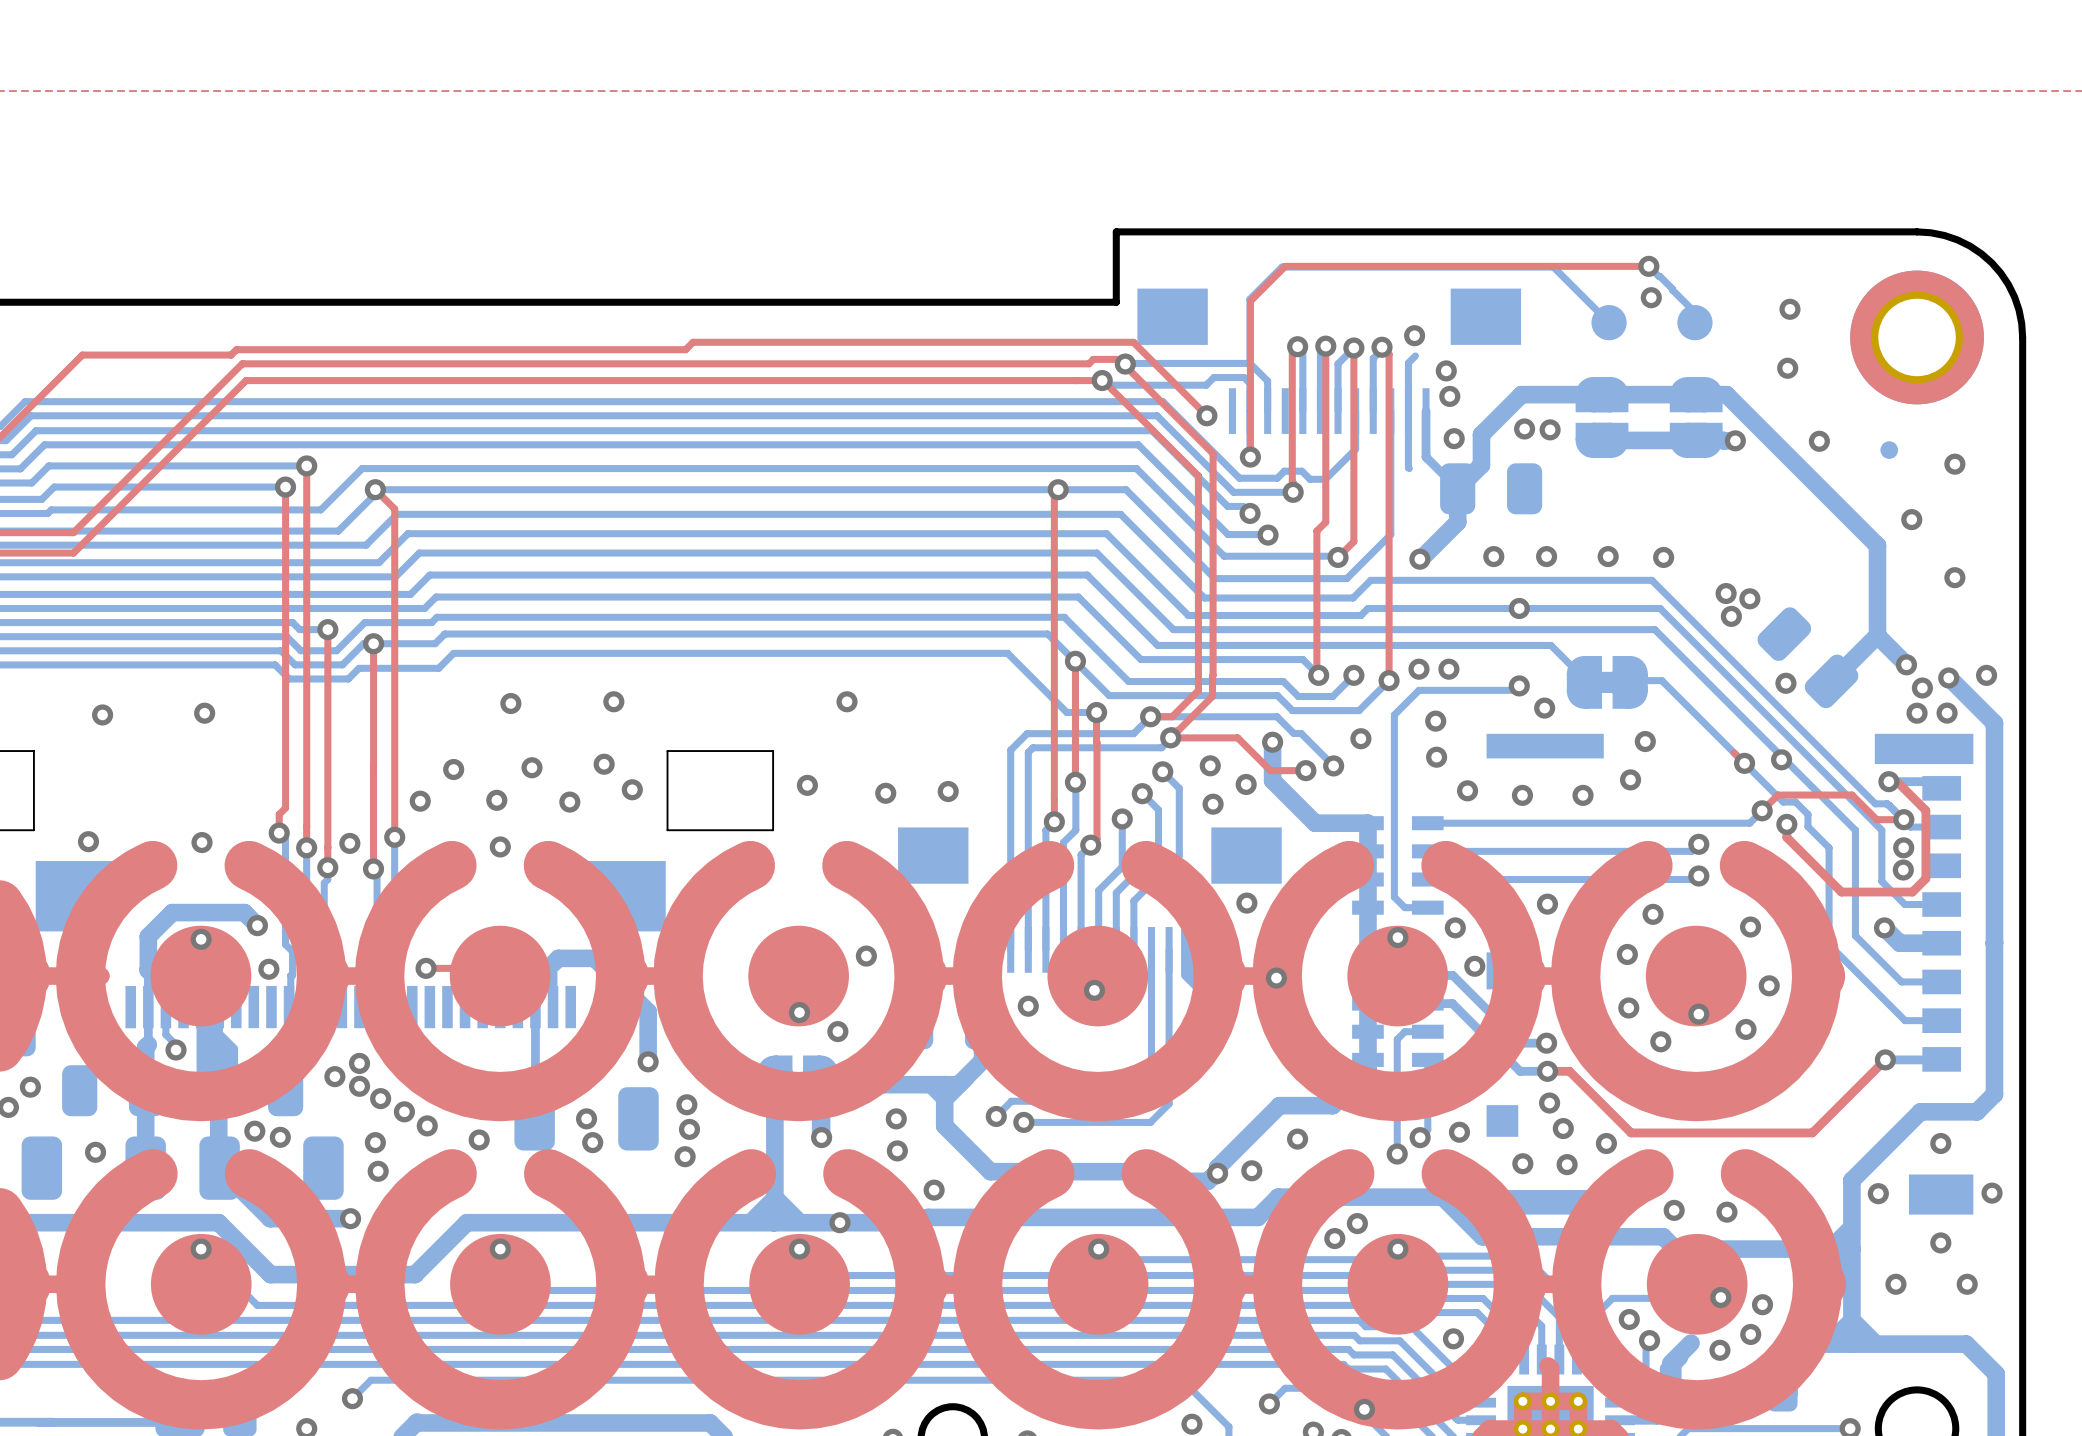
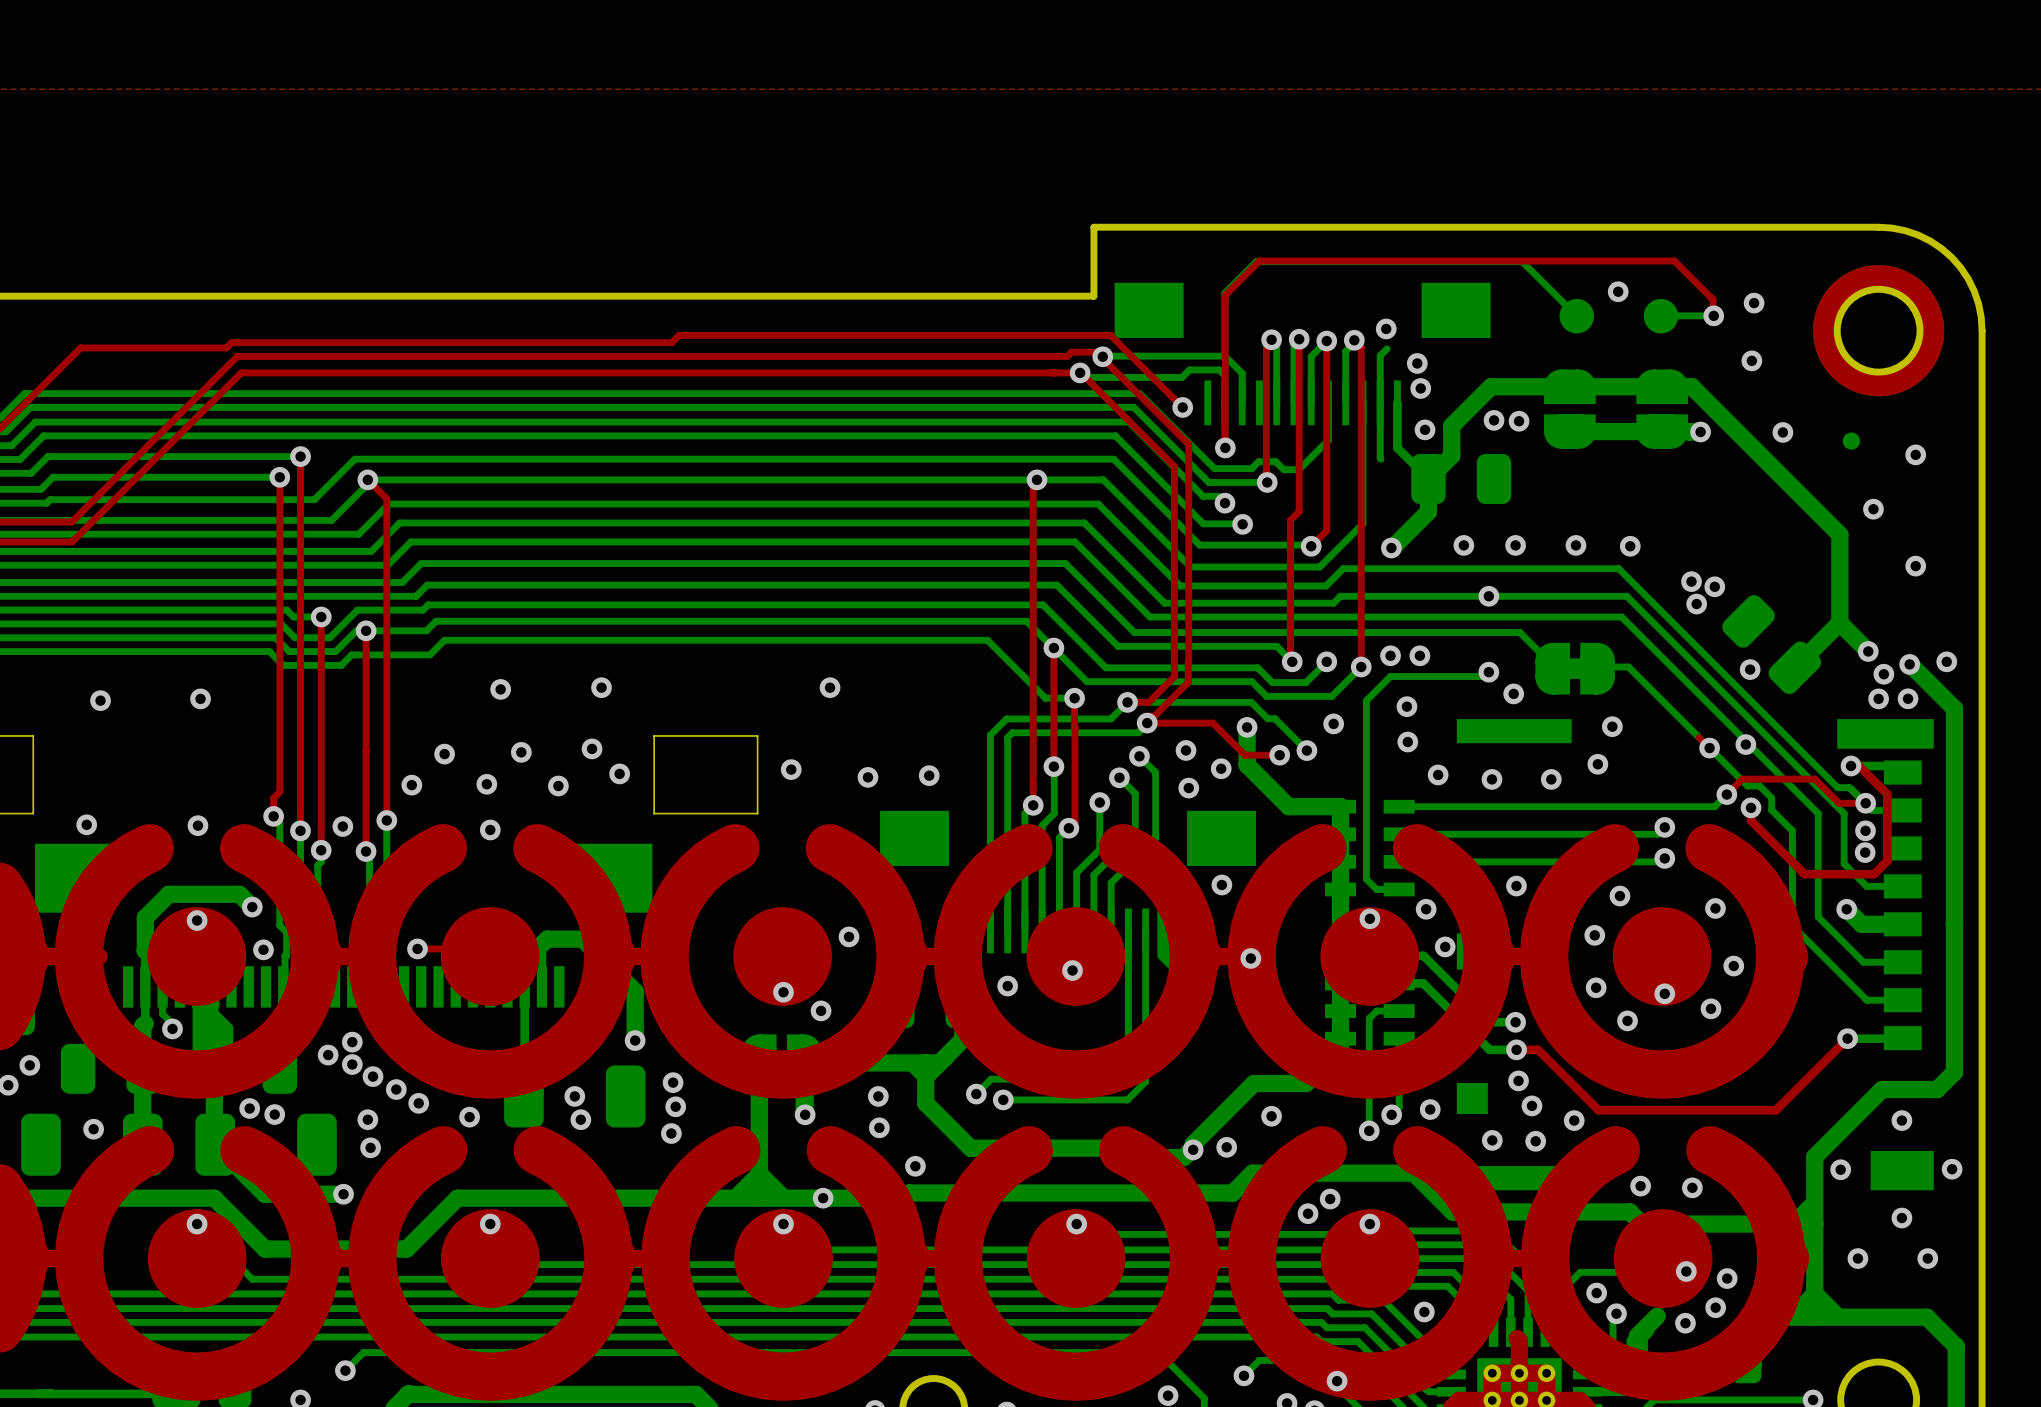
bottom track: (1648, 266) (1695, 312) (1695, 322) -> (1713, 315) (1661, 315)
top track: none -> (1615, 261) (1674, 261) (1713, 299) (1713, 316)
via position: (1648, 266) -> (1713, 315)

